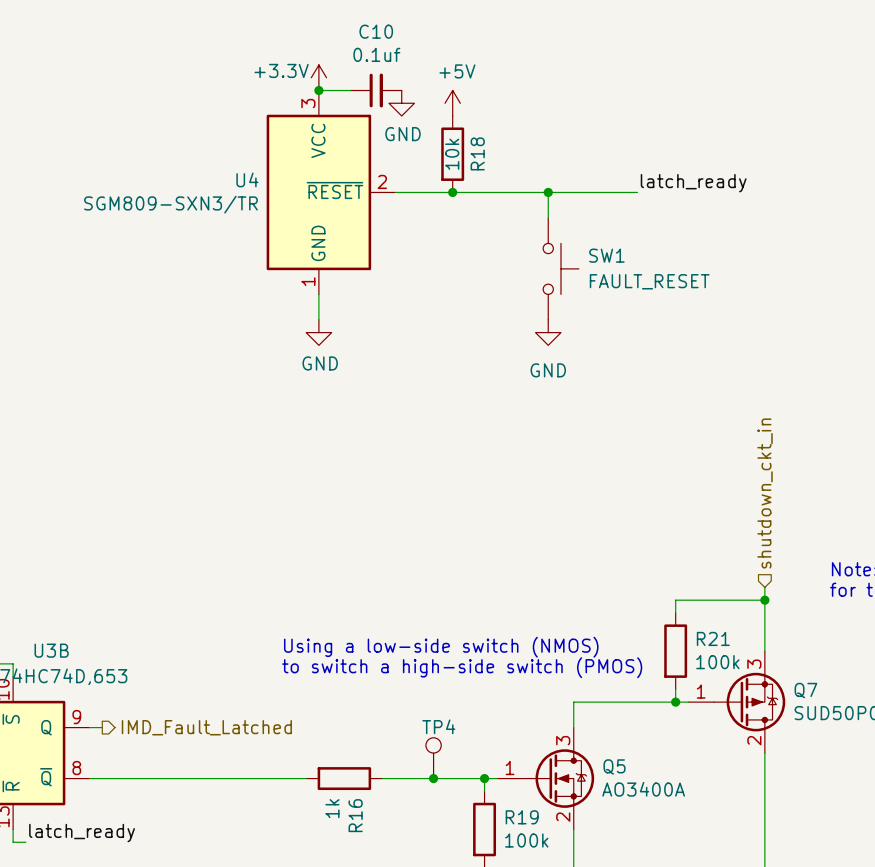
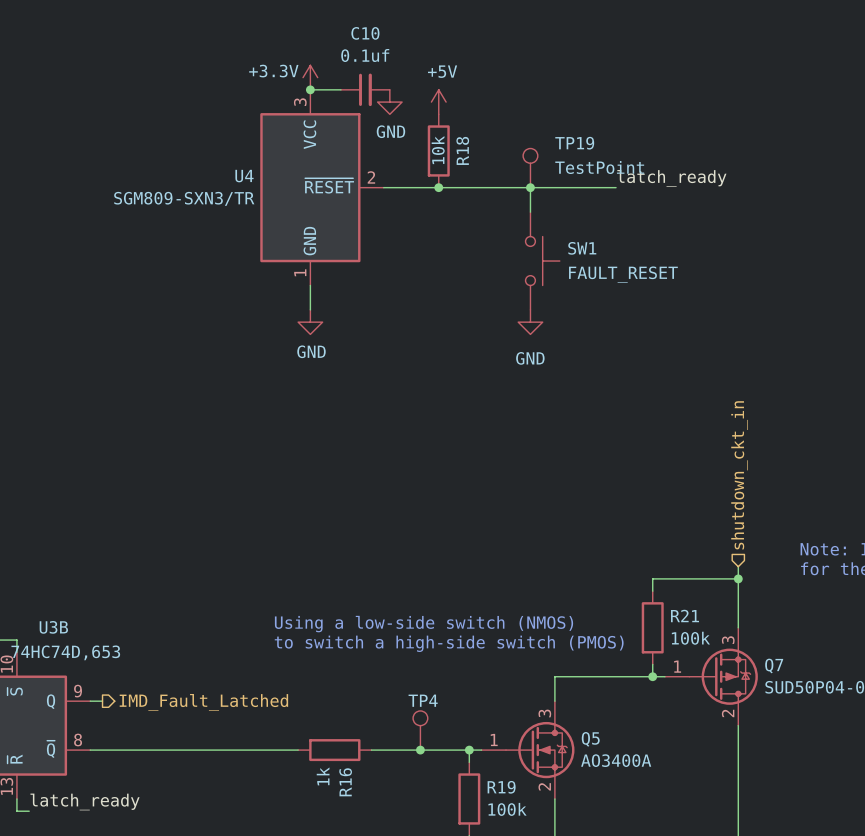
TP19: none -> TestPoint (530, 168)

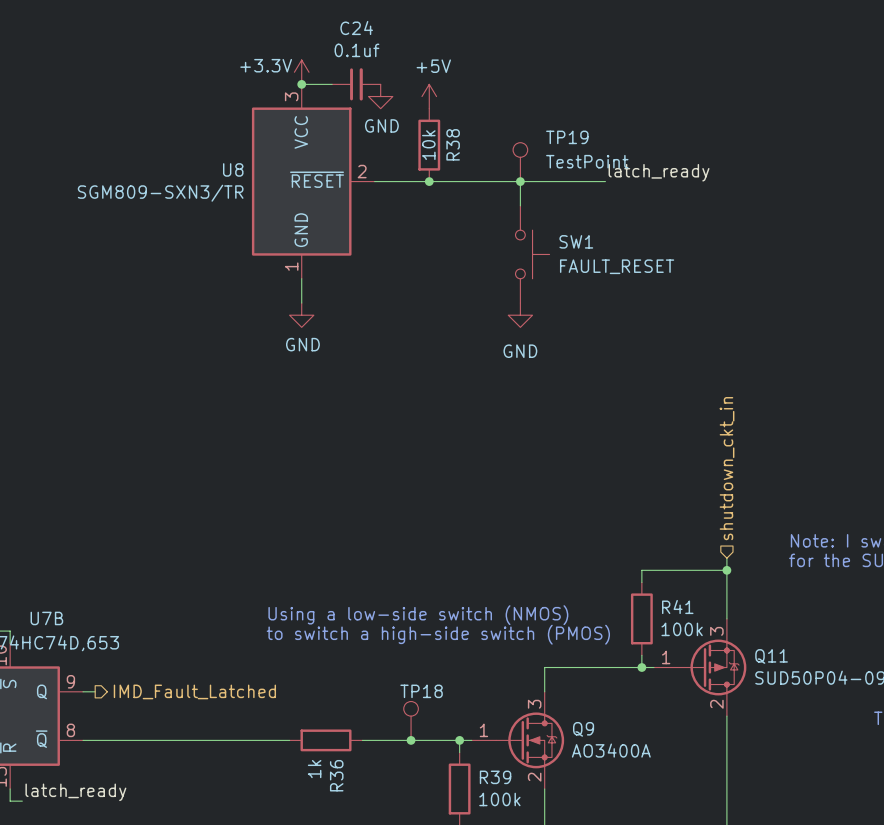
C10 name: C10 (365, 33) -> C24 (356, 28)
R18 name: R18 (462, 150) -> R38 (453, 144)
U4 name: U4 (244, 176) -> U8 (233, 169)
R21 name: R21 (685, 616) -> R41 (677, 607)
U3B name: U3B (53, 627) -> U7B (46, 618)
Q7 name: Q7 (774, 666) -> Q11 (771, 656)
TP4 name: TP4 (423, 700) -> TP18 (421, 691)
Q5 name: Q5 (590, 739) -> Q9 (583, 729)
R16 name: R16 (345, 782) -> R36 (336, 775)
R19 name: R19 (501, 787) -> R39 (495, 777)

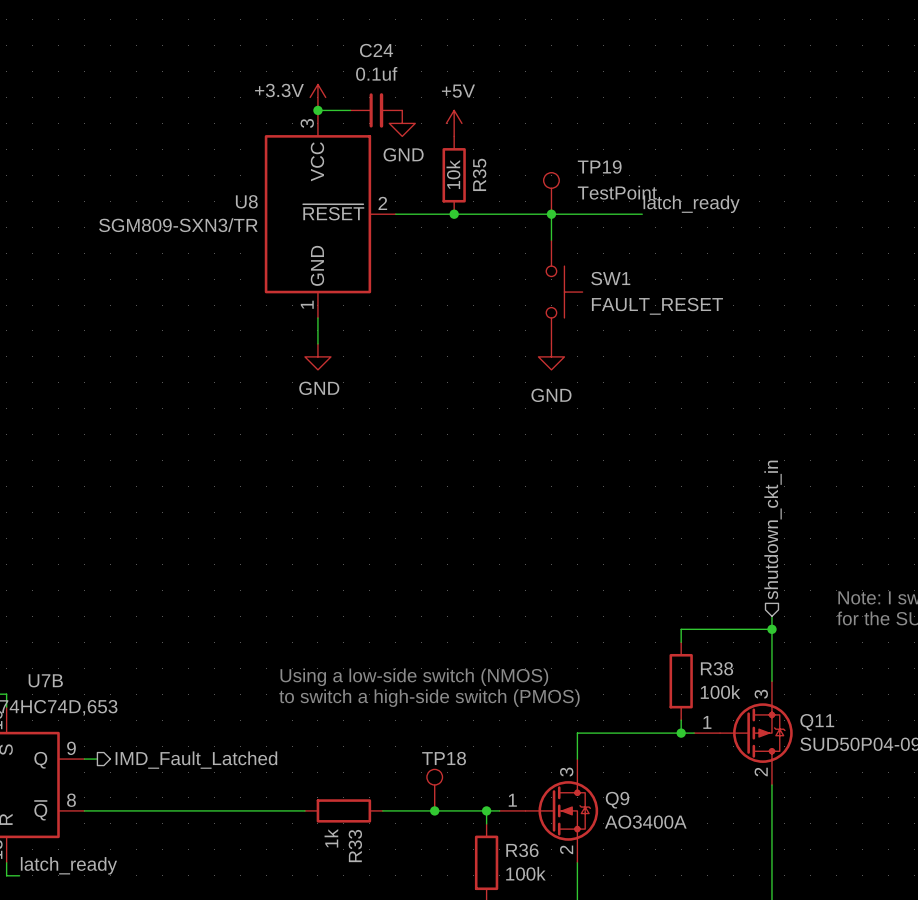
R38 name: R38 (453, 144) -> R35 (479, 174)
R41 name: R41 (677, 607) -> R38 (717, 668)
R36 name: R36 (336, 775) -> R33 (355, 846)
R39 name: R39 (495, 777) -> R36 (522, 850)

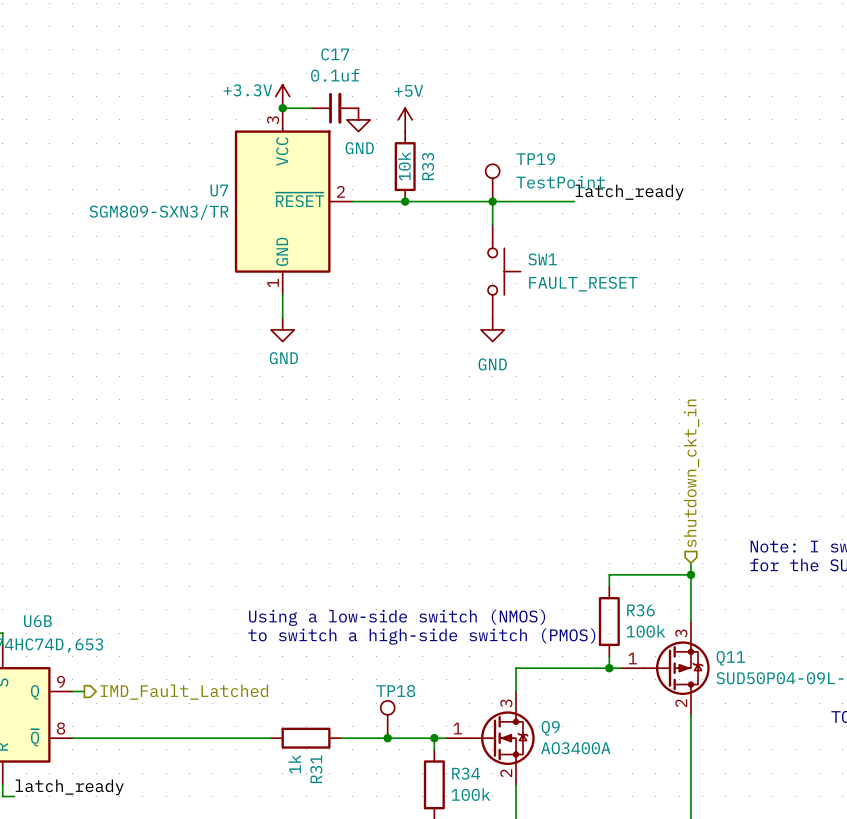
C24 name: C24 (376, 50) -> C17 (335, 54)
R35 name: R35 (479, 174) -> R33 (428, 166)
U8 name: U8 (246, 201) -> U7 (219, 190)
R38 name: R38 (717, 668) -> R36 (640, 610)
U7B name: U7B (45, 680) -> U6B (37, 621)
R33 name: R33 (355, 846) -> R31 (316, 769)
R36 name: R36 (522, 850) -> R34 (466, 773)

